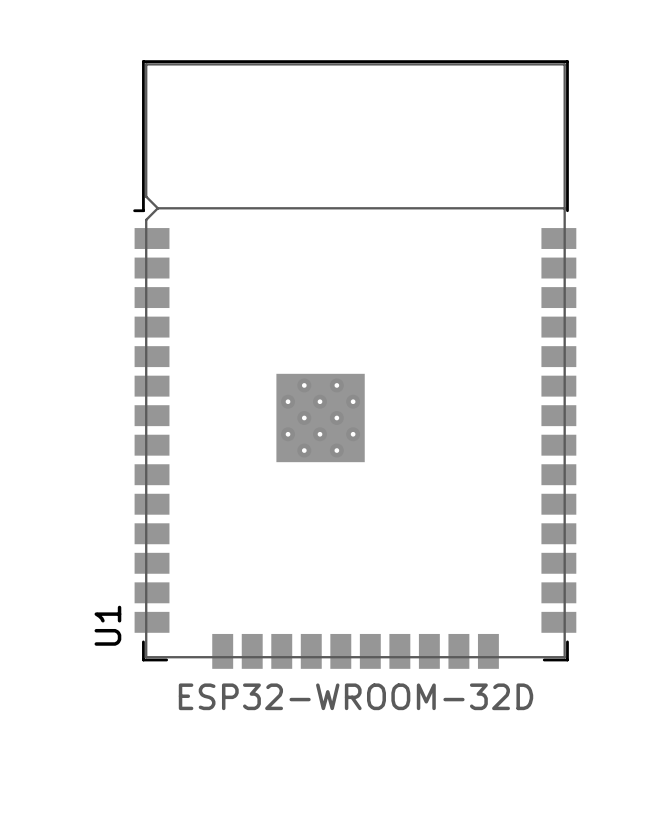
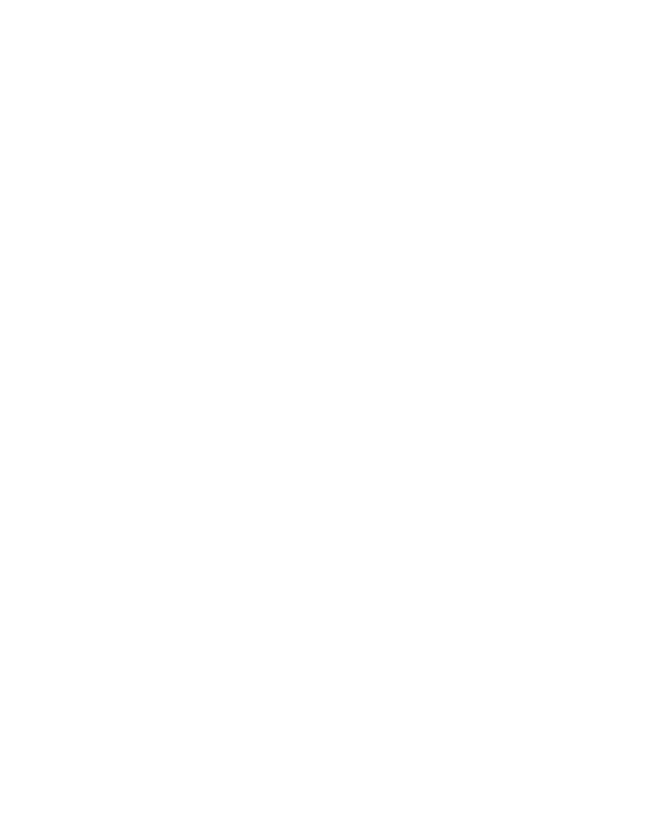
U1: ESP32-WROOM-32D (354, 364) -> none

